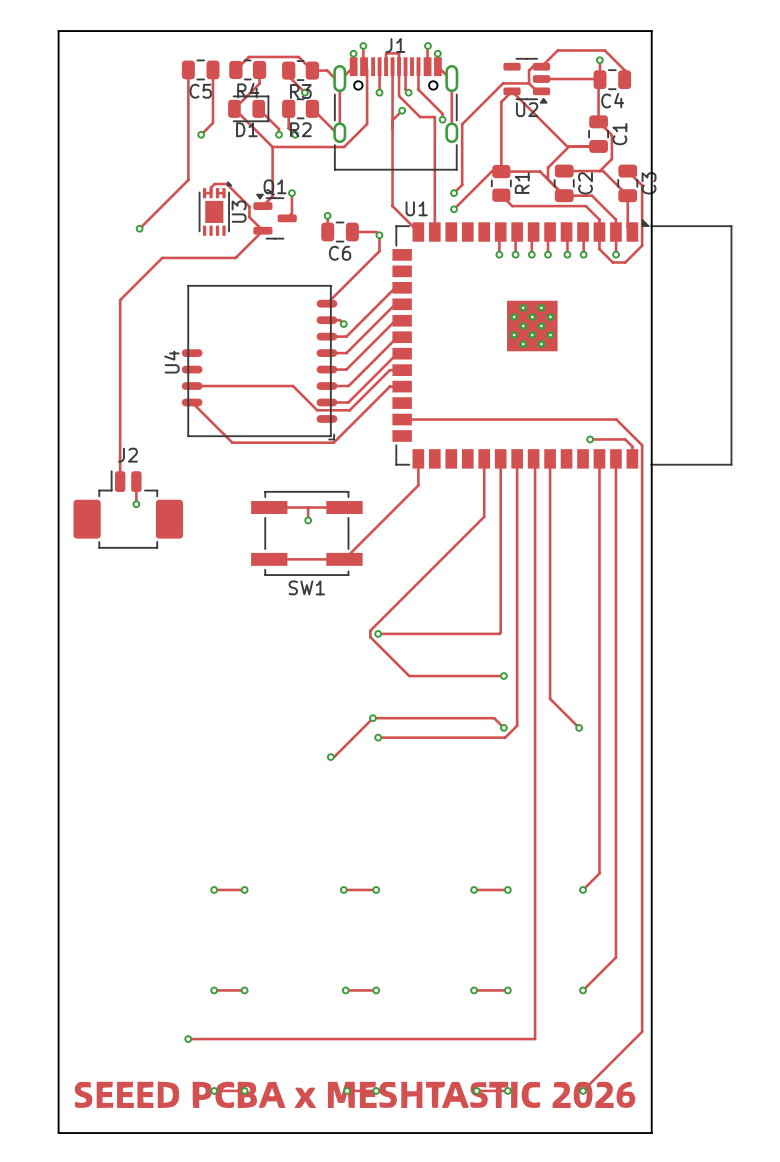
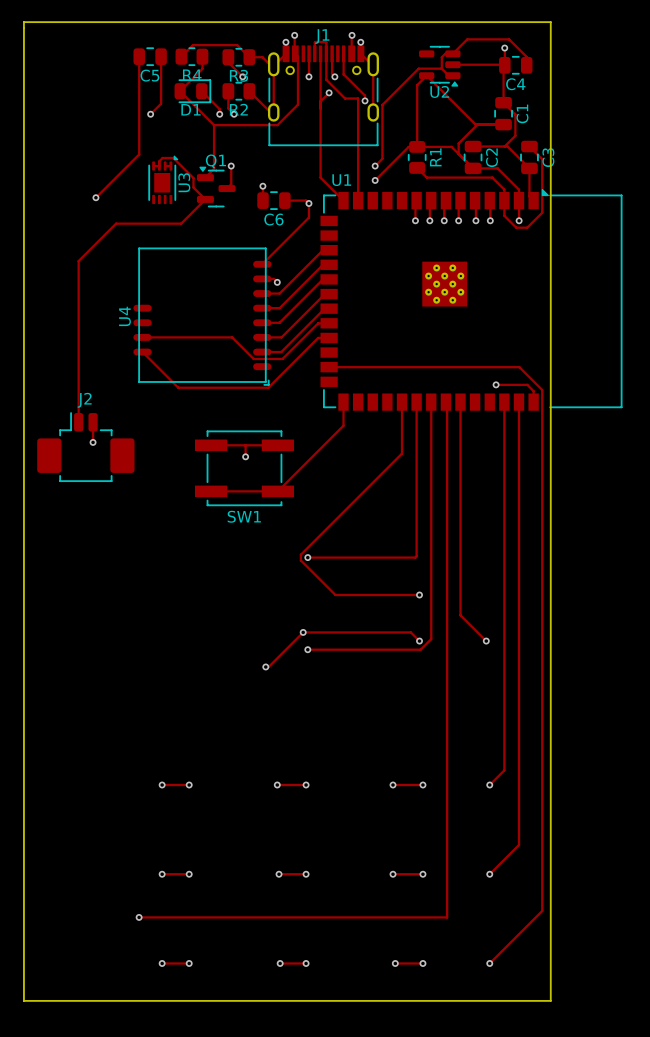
drawing: [74, 1081, 636, 1109] -> none

